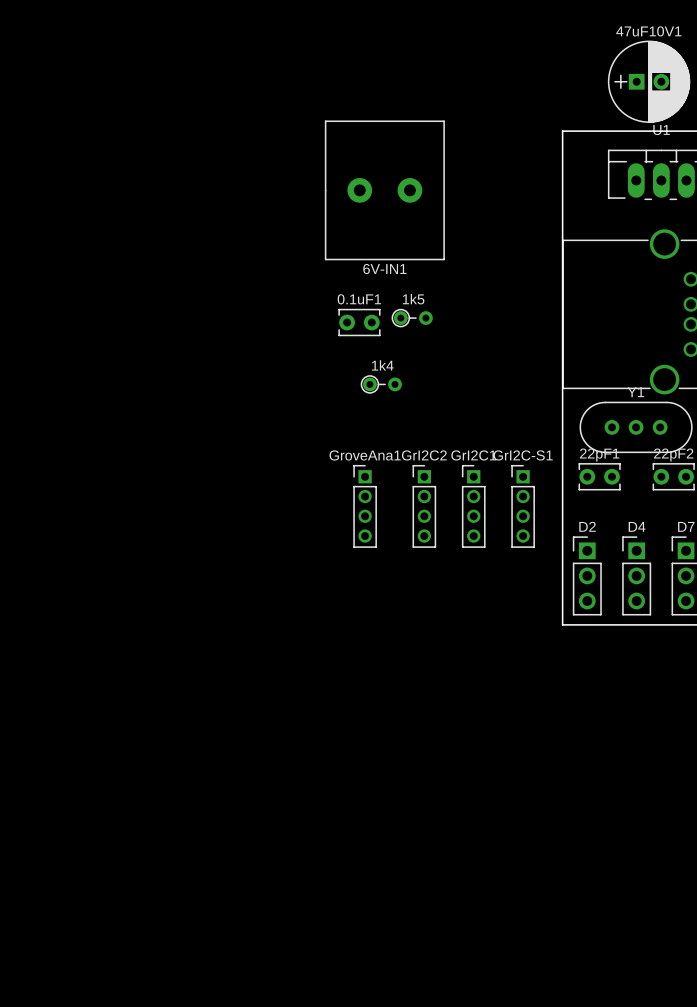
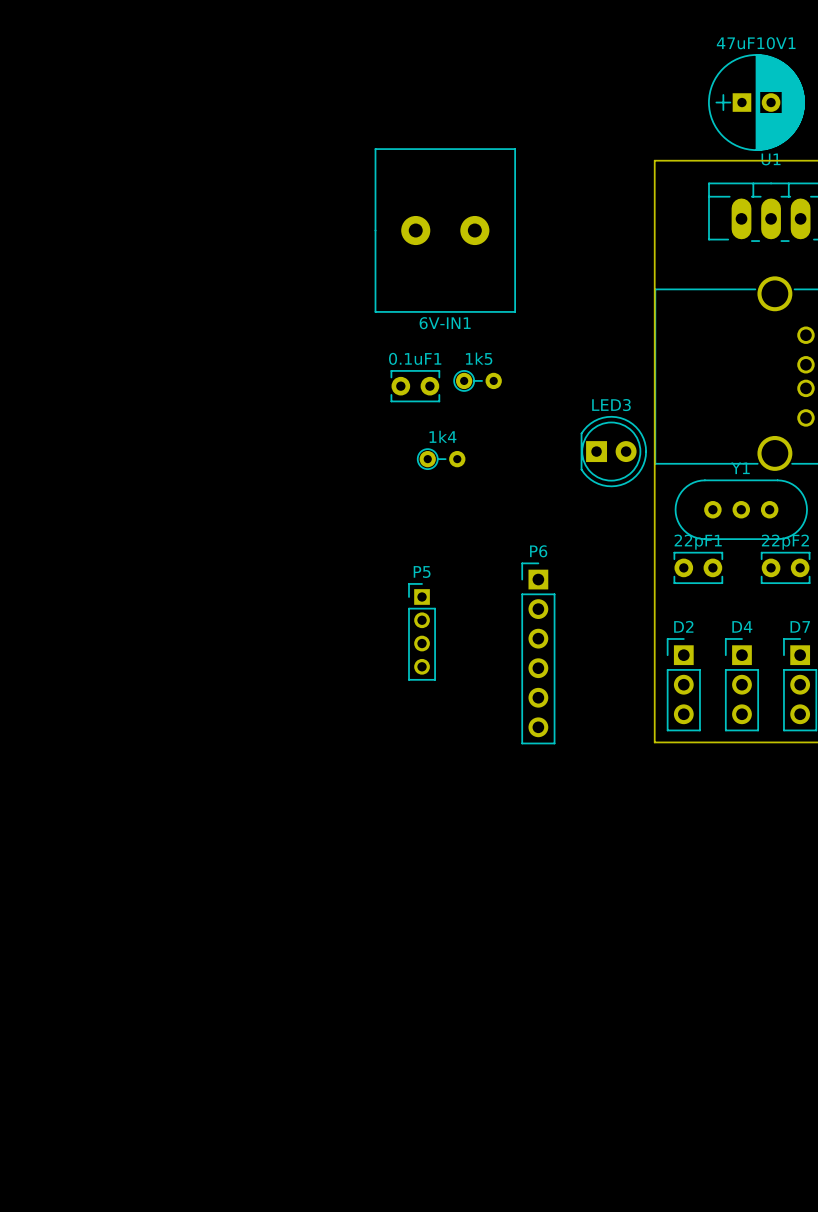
LED3: none -> (613, 451)
GroveAna1: (365, 506) -> none
GrI2C2: (424, 506) -> none
GrI2C1: (473, 506) -> none
GrI2C-S1: (523, 506) -> none
P5: none -> (422, 631)
P6: none -> (538, 653)

